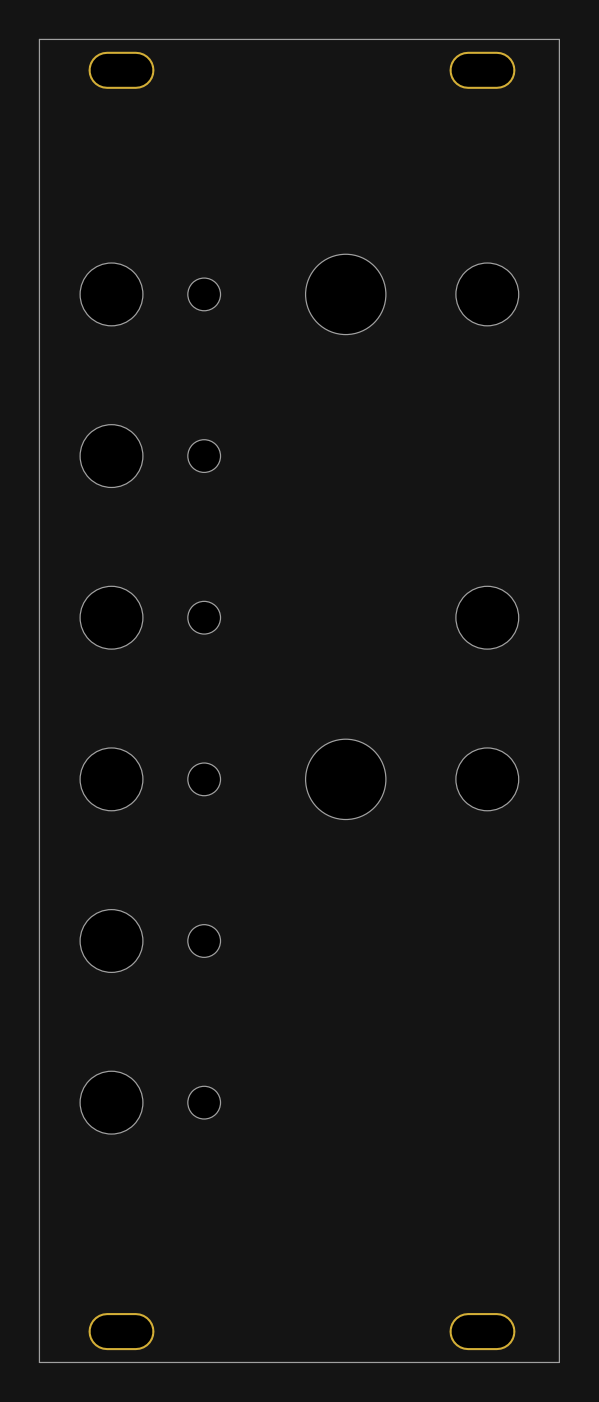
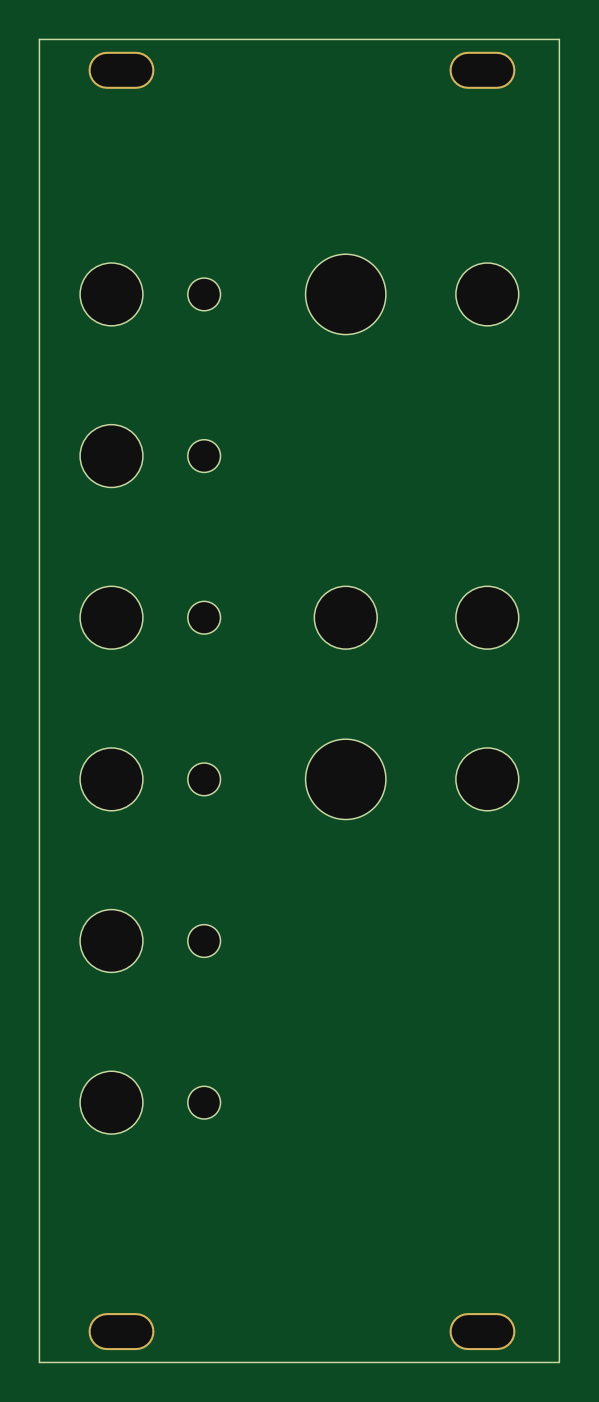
part: none -> (345, 617)

